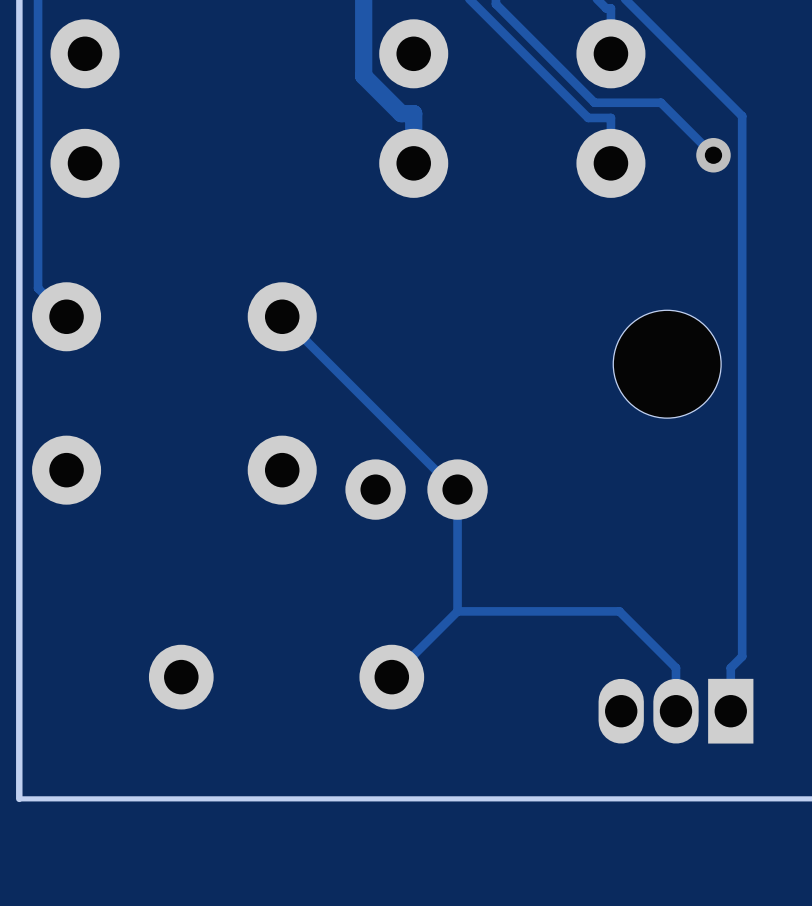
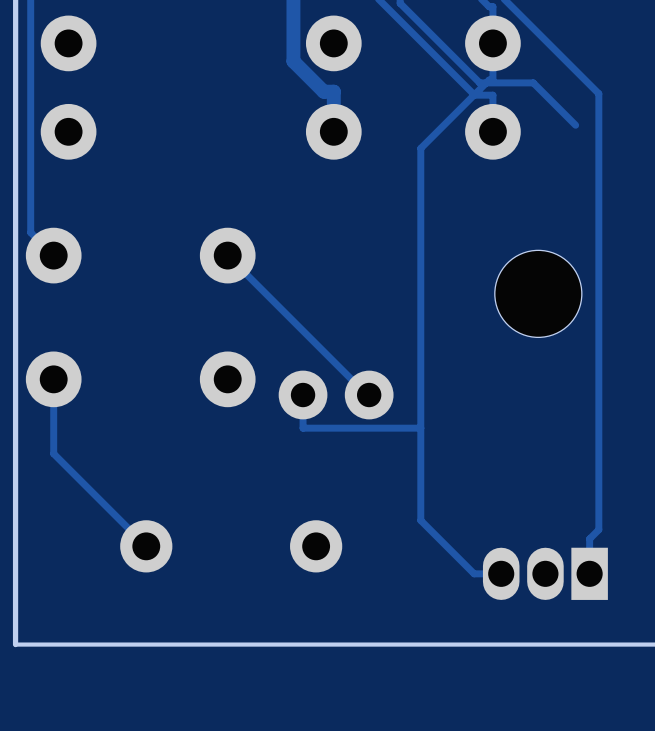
track: none -> (492, 43) (492, 80) (489, 80) (420, 148) (420, 520) (474, 573) (501, 573)
via: (713, 155) -> none
track: none -> (53, 379) (53, 453) (146, 546)
track: none -> (303, 395) (303, 428) (420, 428)
track: (457, 489) (457, 611) -> none
track: (457, 611) (391, 677) -> none
track: (457, 611) (619, 611) (675, 667) (675, 711) -> none

